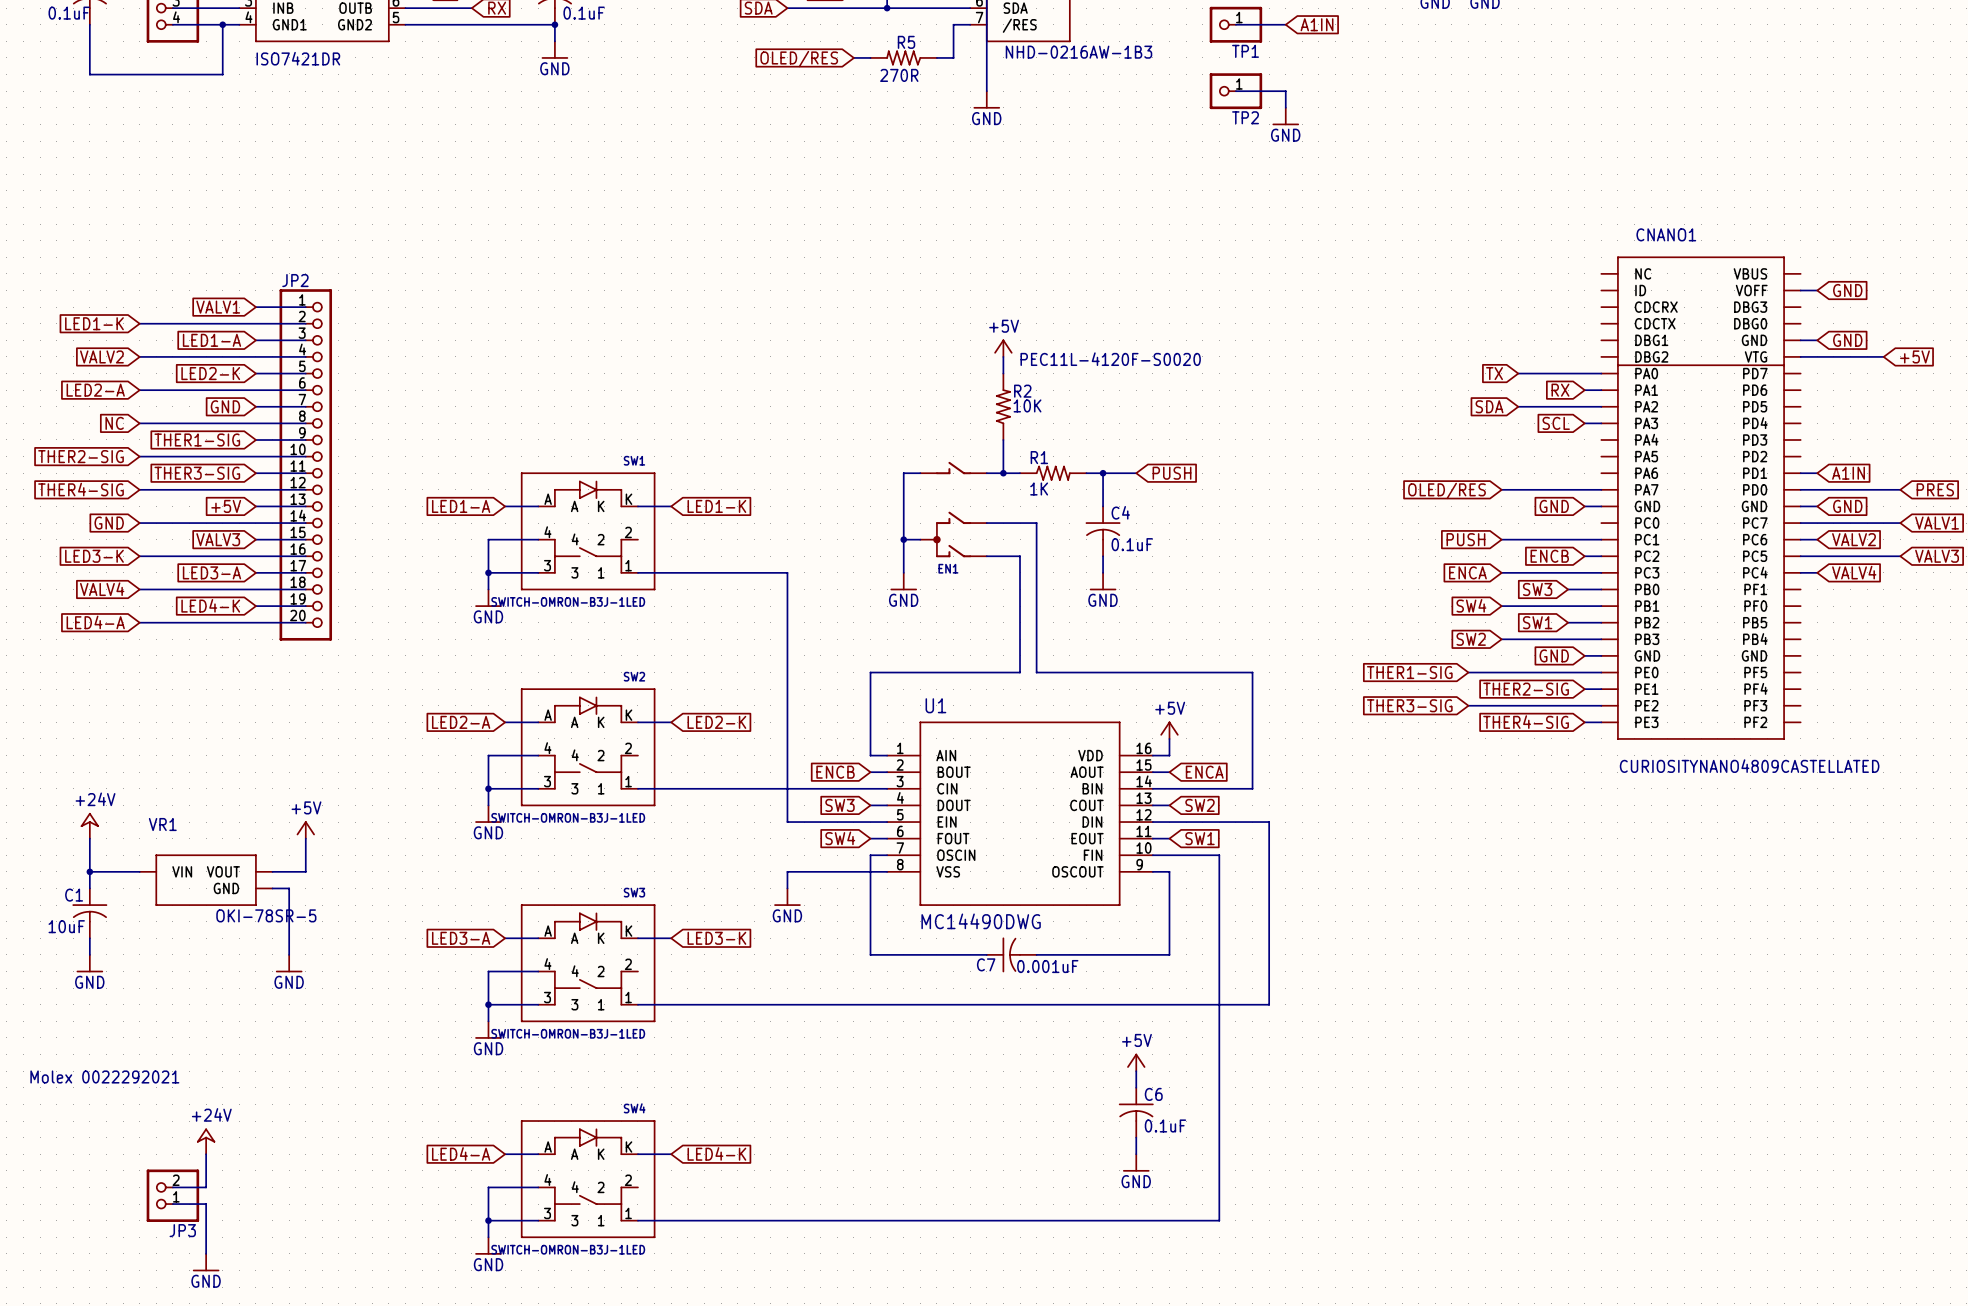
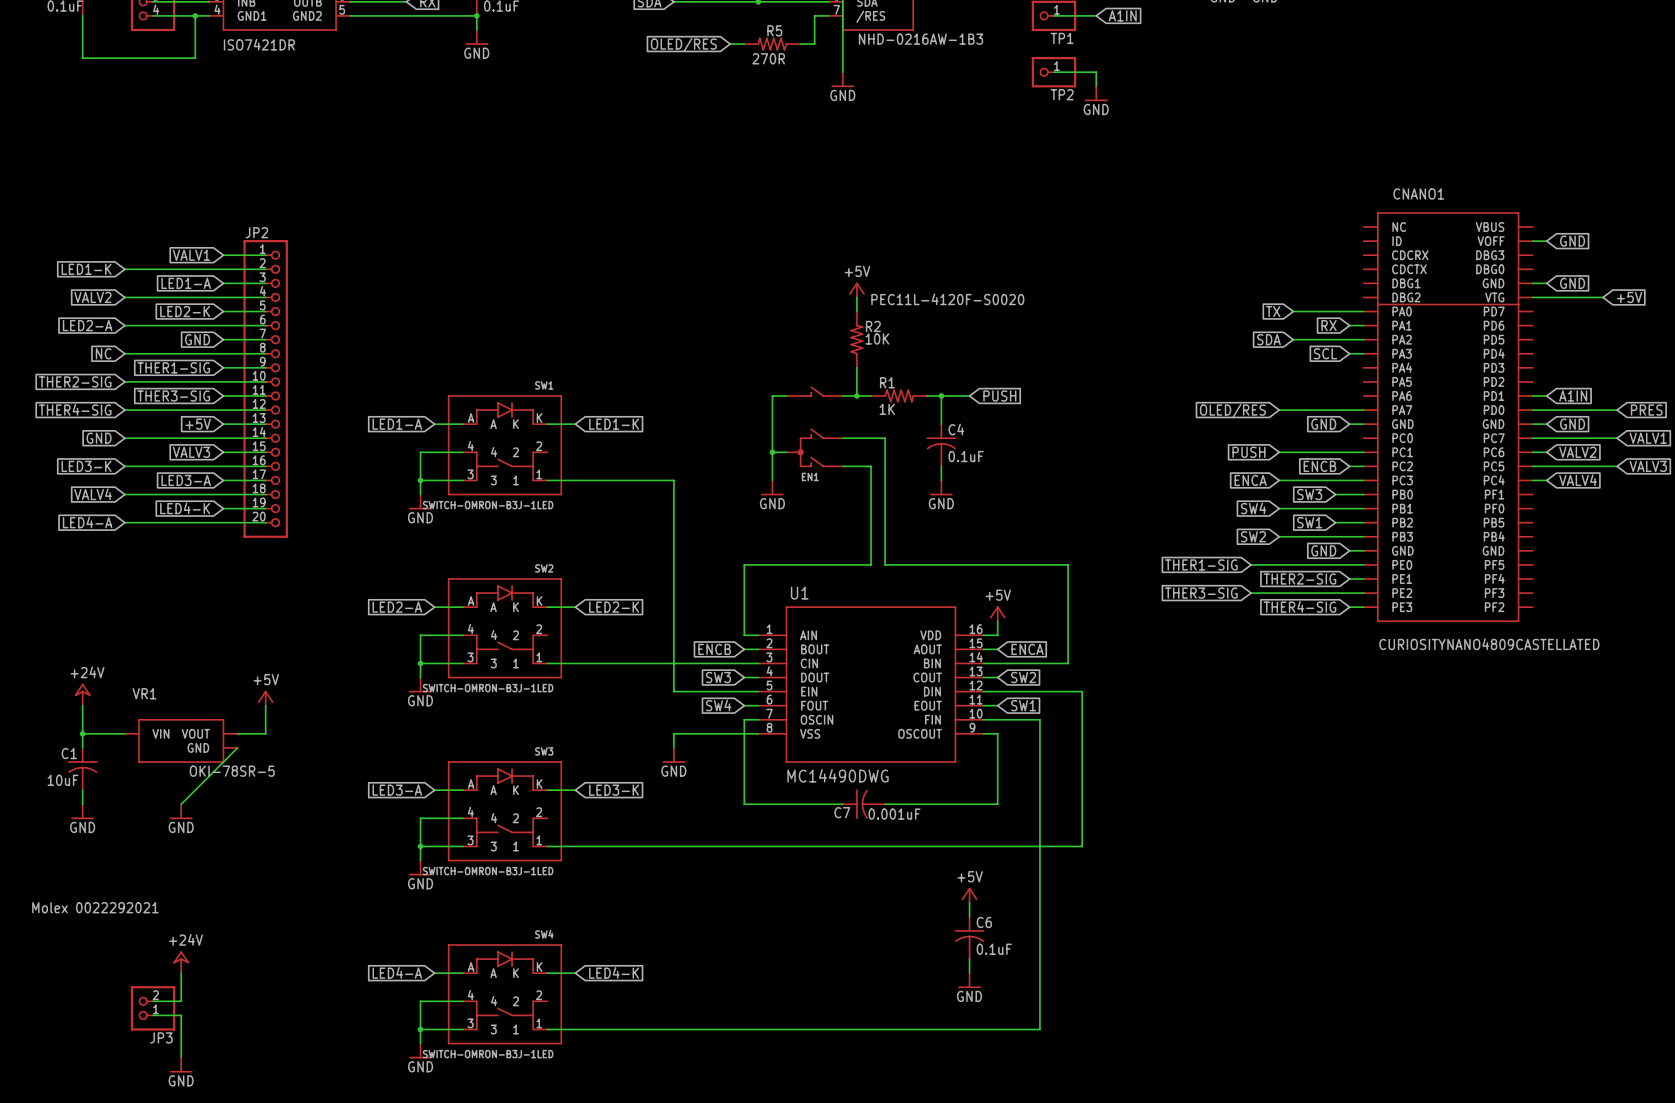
wire: (272, 888) (289, 888) (289, 954) -> (237, 747) (181, 804)
power symbol position: GND (289, 963) -> GND (181, 811)

